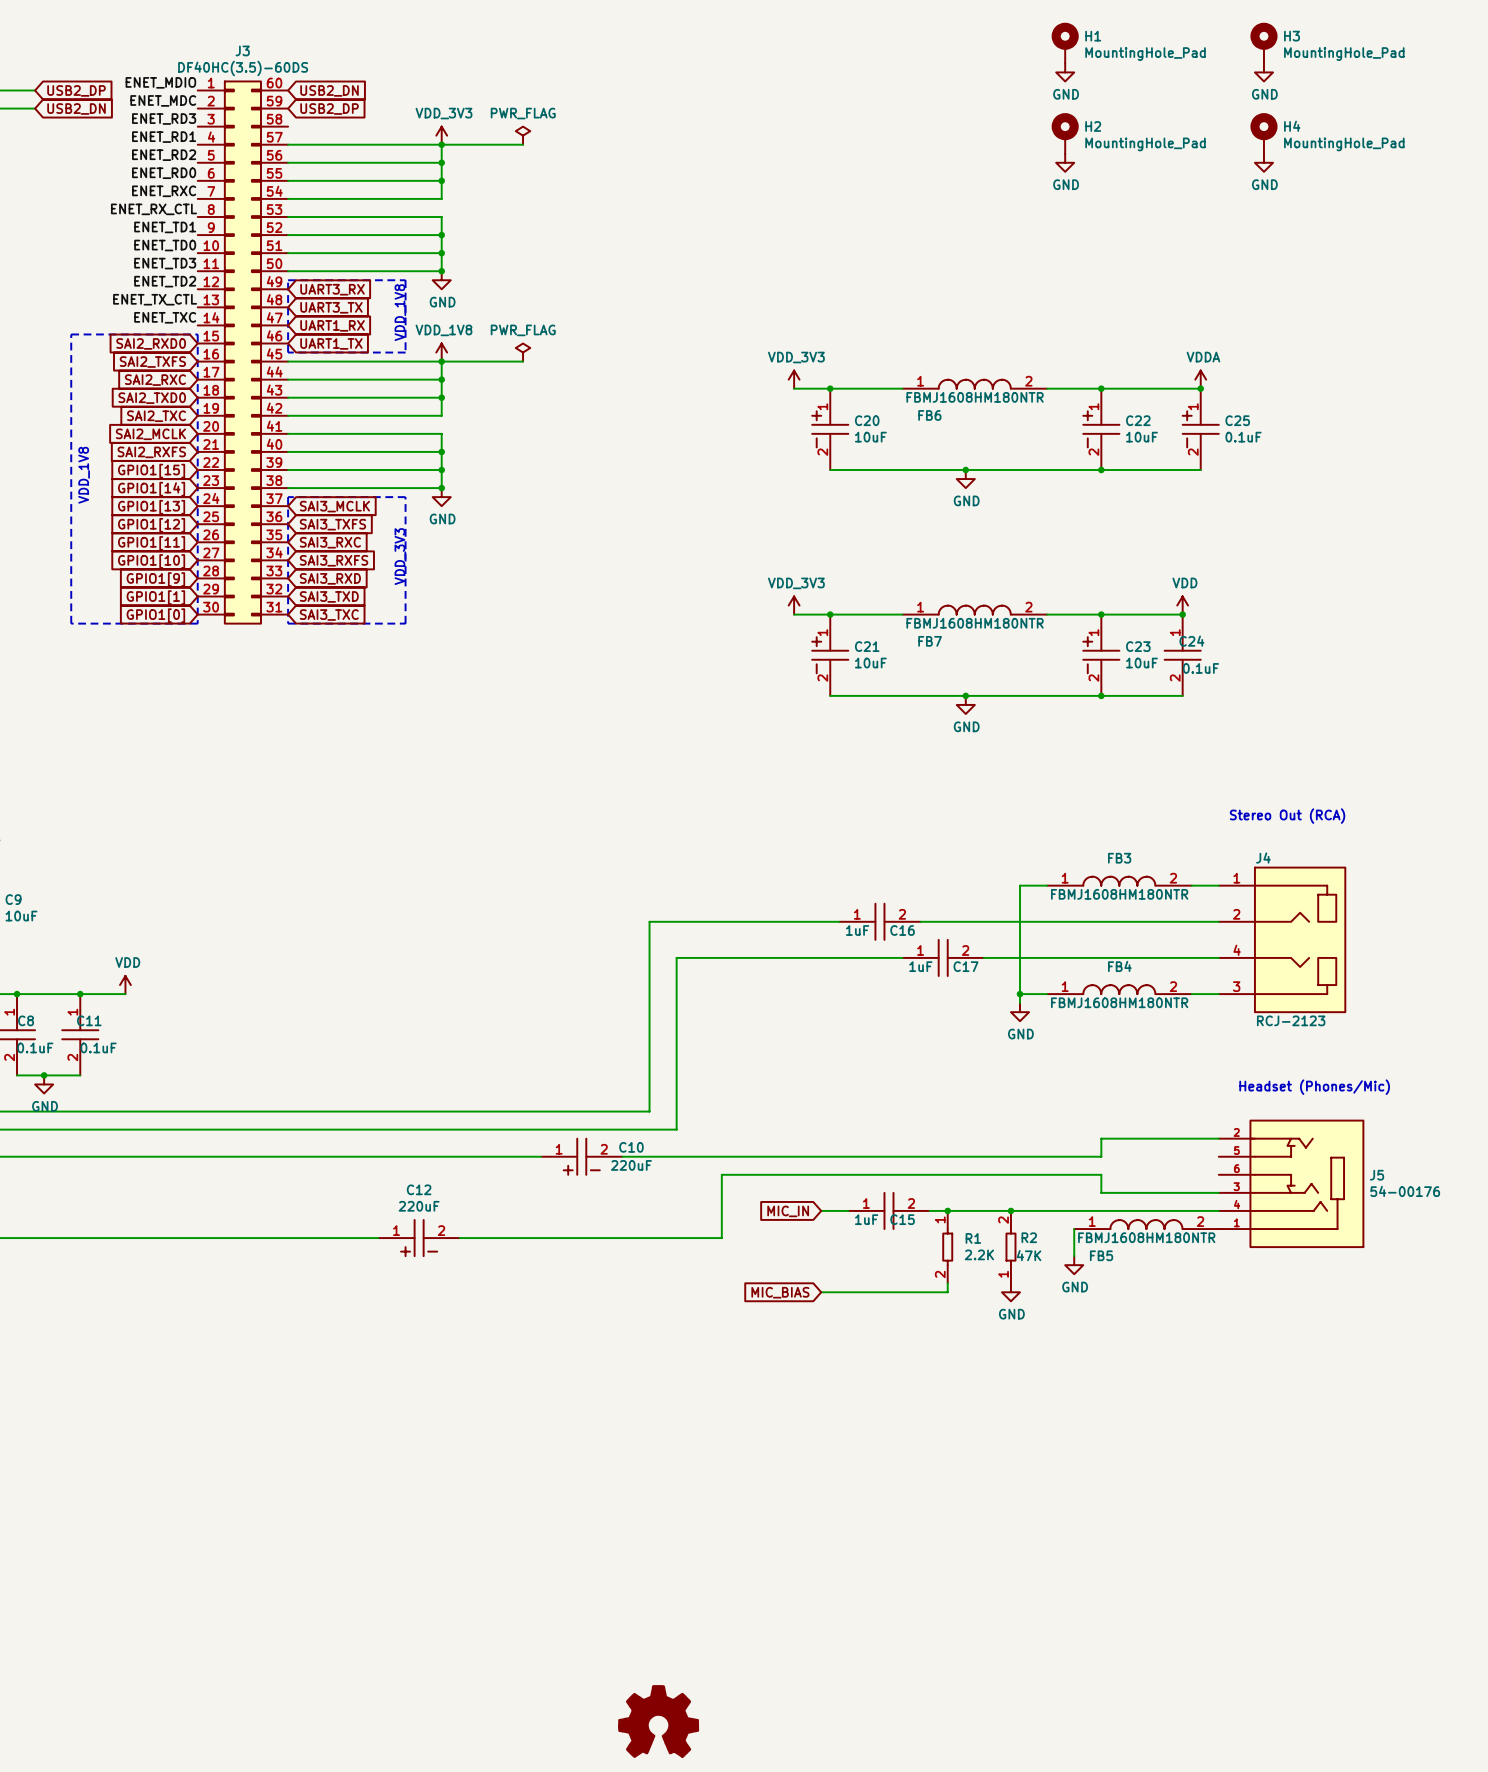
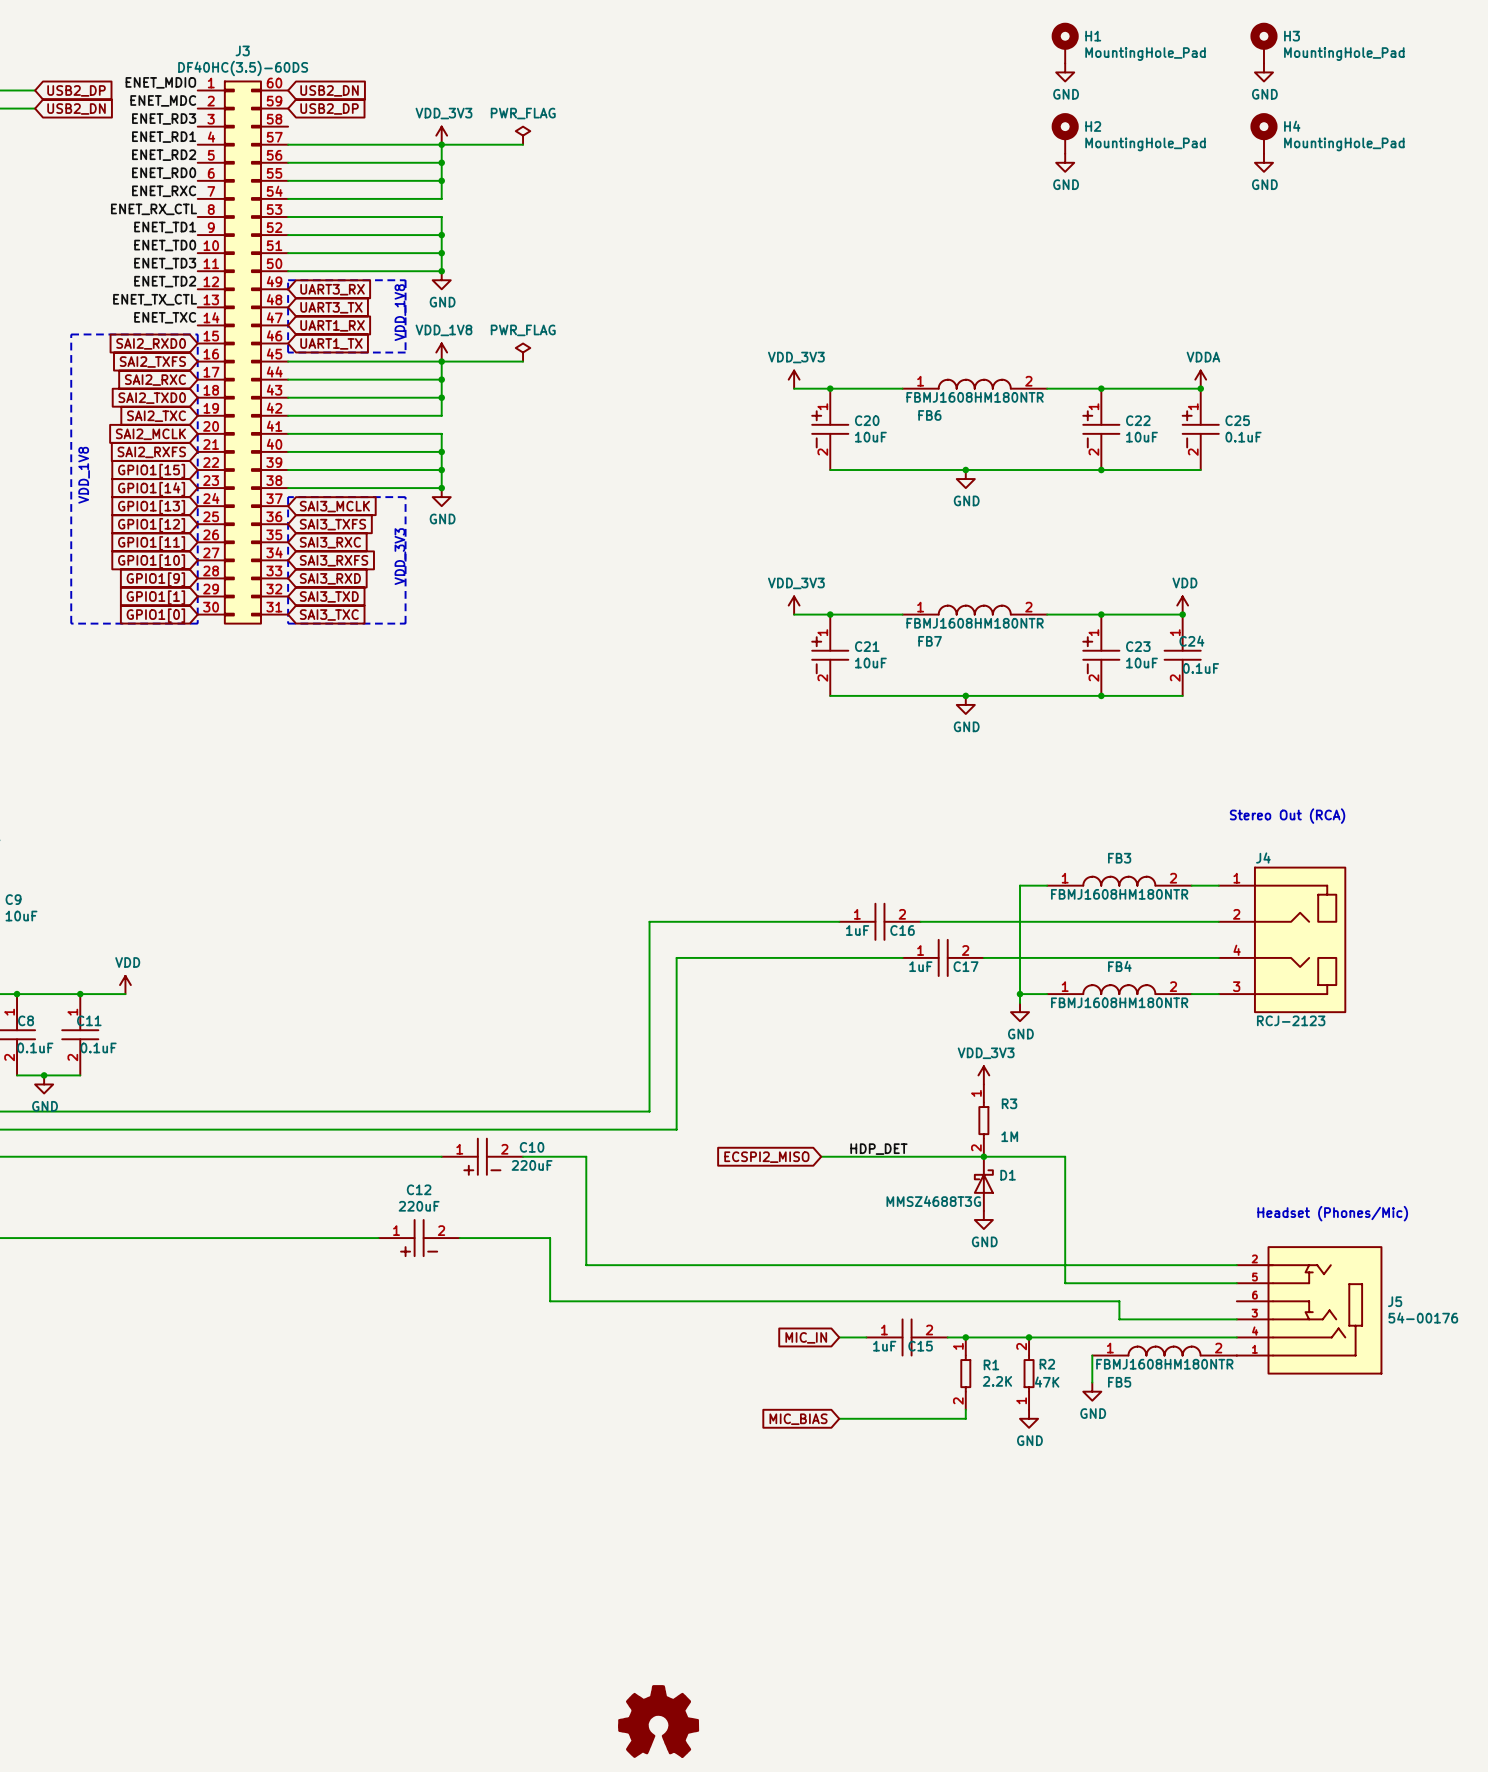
power symbol: none -> VDD_3V3 (983, 1075)
text position: Headset (Phones/Mic) (1314, 1087) -> Headset (Phones/Mic) (1332, 1213)
R3: none -> (983, 1120)
wire: (1218, 1138) (1101, 1138) (1101, 1156) (1065, 1156) -> (1236, 1283) (1065, 1283) (1065, 1156)
label: none -> HDP_DET (878, 1149)
wire: none -> (541, 1156) (586, 1156) (586, 1265) (1236, 1265)
C10 position: (581, 1156) -> (482, 1156)
wire: (622, 1156) (821, 1156) -> none
junction: none -> (983, 1156)
global label: none -> ECSPI2_MISO (766, 1157)
D1: none -> MMSZ4688T3G (983, 1183)
J5 position: (1291, 1183) -> (1309, 1310)
wire: (1218, 1192) (1101, 1192) (1101, 1174) (721, 1174) (721, 1238) (550, 1238) -> (1236, 1319) (1119, 1319) (1119, 1301) (550, 1301) (550, 1238)
wire: (821, 1210) (848, 1210) -> (839, 1337) (866, 1337)
C15 position: (888, 1210) -> (907, 1337)
wire: (929, 1210) (1218, 1210) -> (947, 1337) (1236, 1337)
junction: (947, 1210) -> none
junction: (1010, 1210) -> none
global label position: MIC_IN (788, 1211) -> MIC_IN (806, 1337)
power symbol: none -> GND (983, 1219)
FB5 position: (1146, 1224) -> (1164, 1351)
wire: (1074, 1229) (1074, 1256) -> (1092, 1355) (1092, 1382)
R1 position: (947, 1247) -> (965, 1373)
R2 position: (1010, 1247) -> (1029, 1373)
power symbol: GND (1074, 1265) -> none
wire: (947, 1283) (947, 1292) (821, 1292) -> (965, 1409) (965, 1418) (839, 1418)
global label position: MIC_BIAS (780, 1292) -> MIC_BIAS (798, 1419)
power symbol: GND (1010, 1292) -> none
junction: none -> (965, 1337)
junction: none -> (1029, 1337)
power symbol: none -> GND (1092, 1391)
power symbol: none -> GND (1029, 1418)

